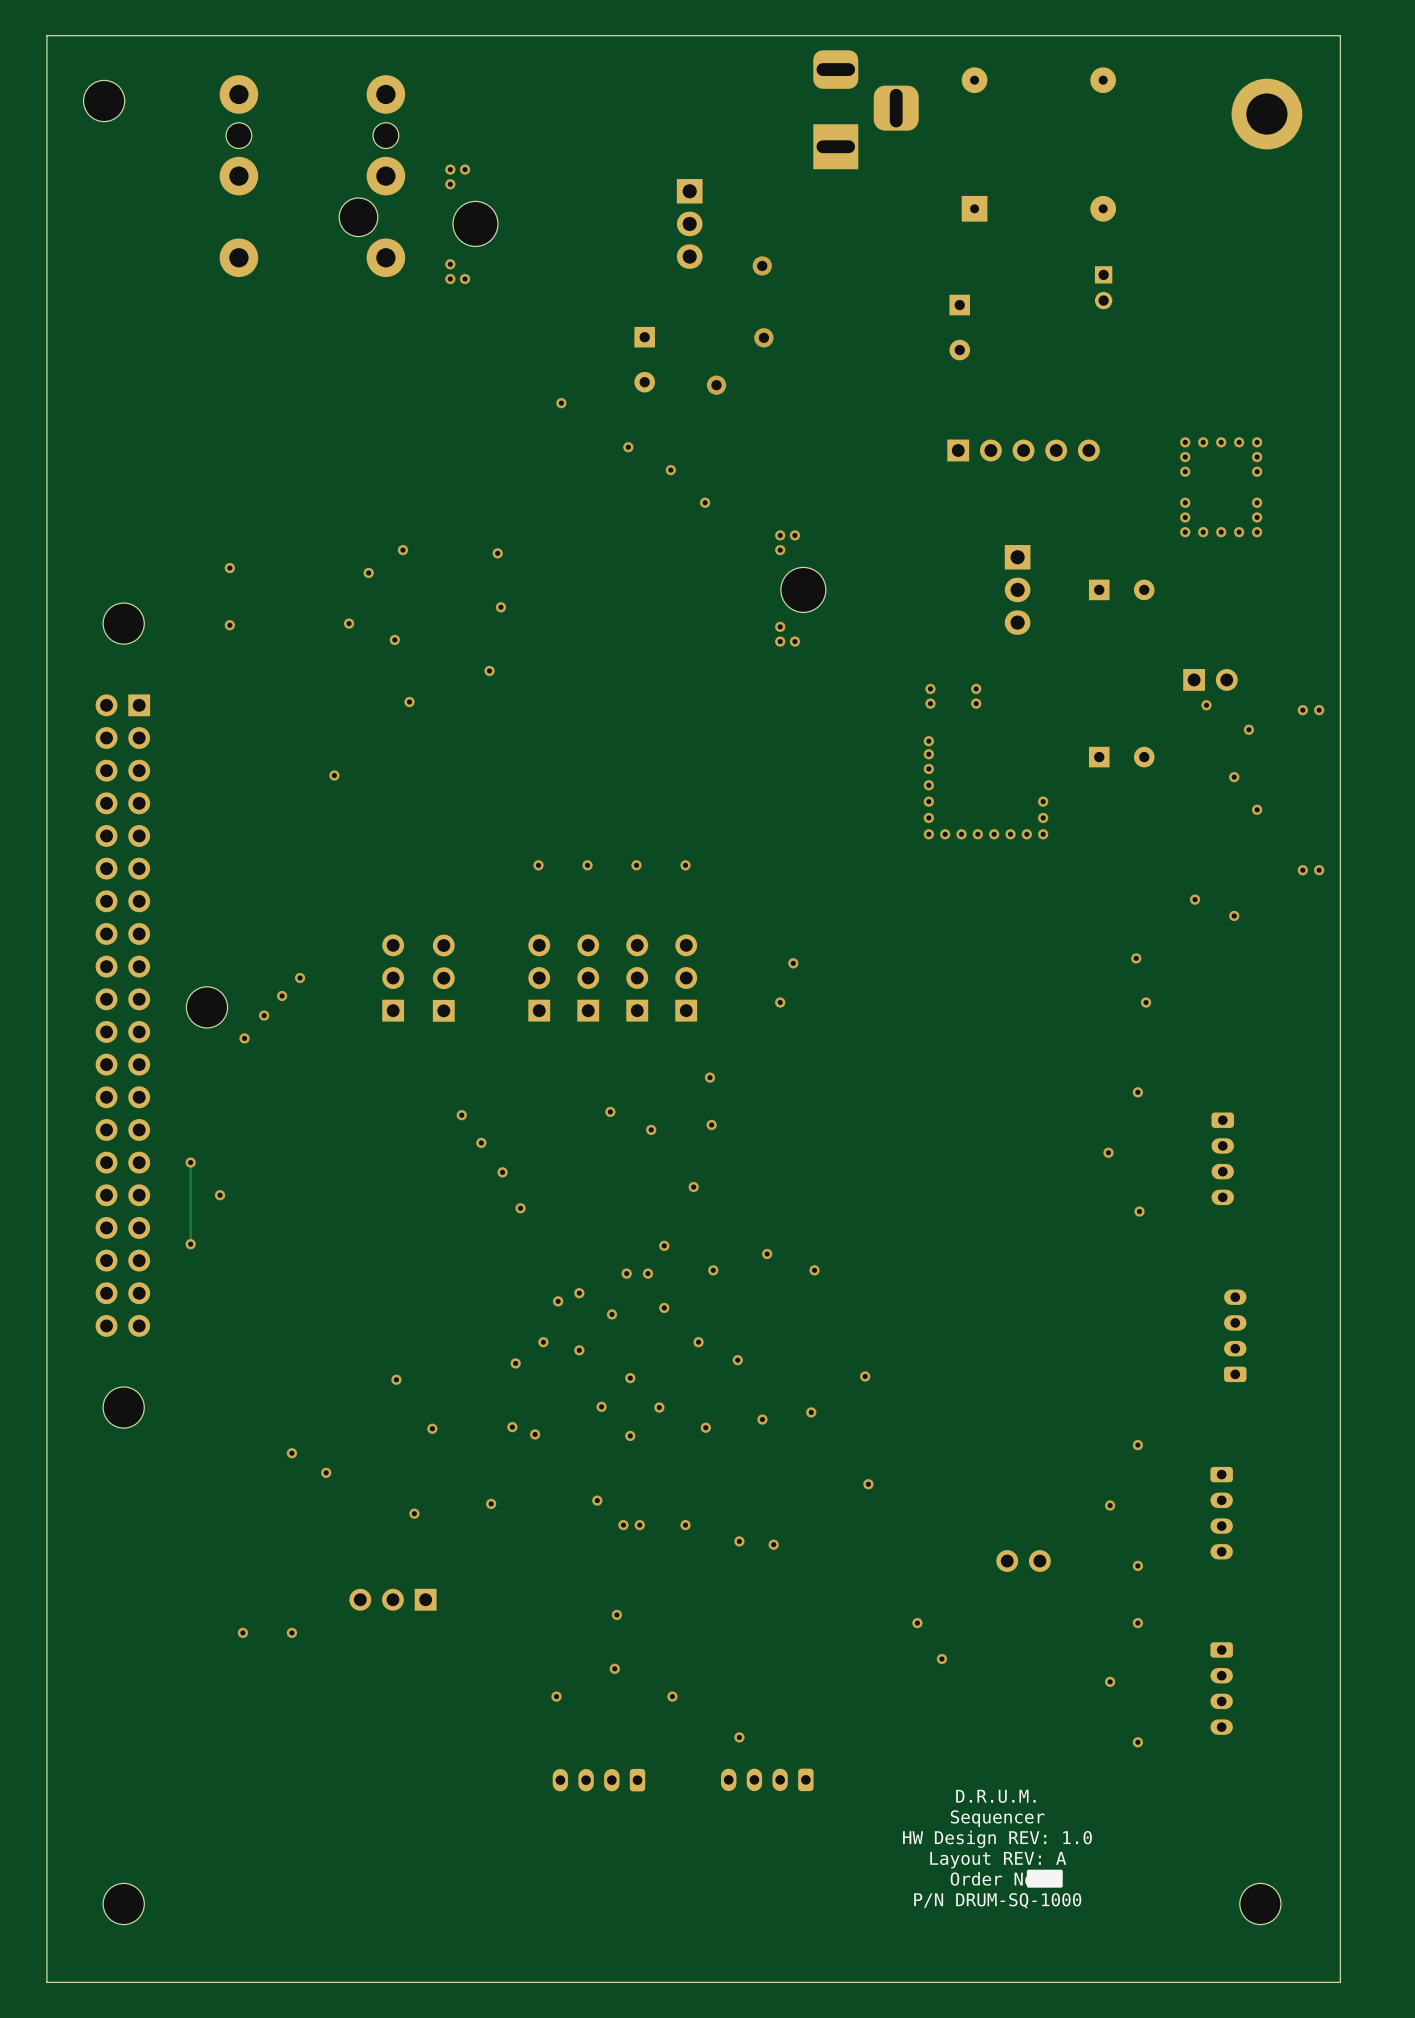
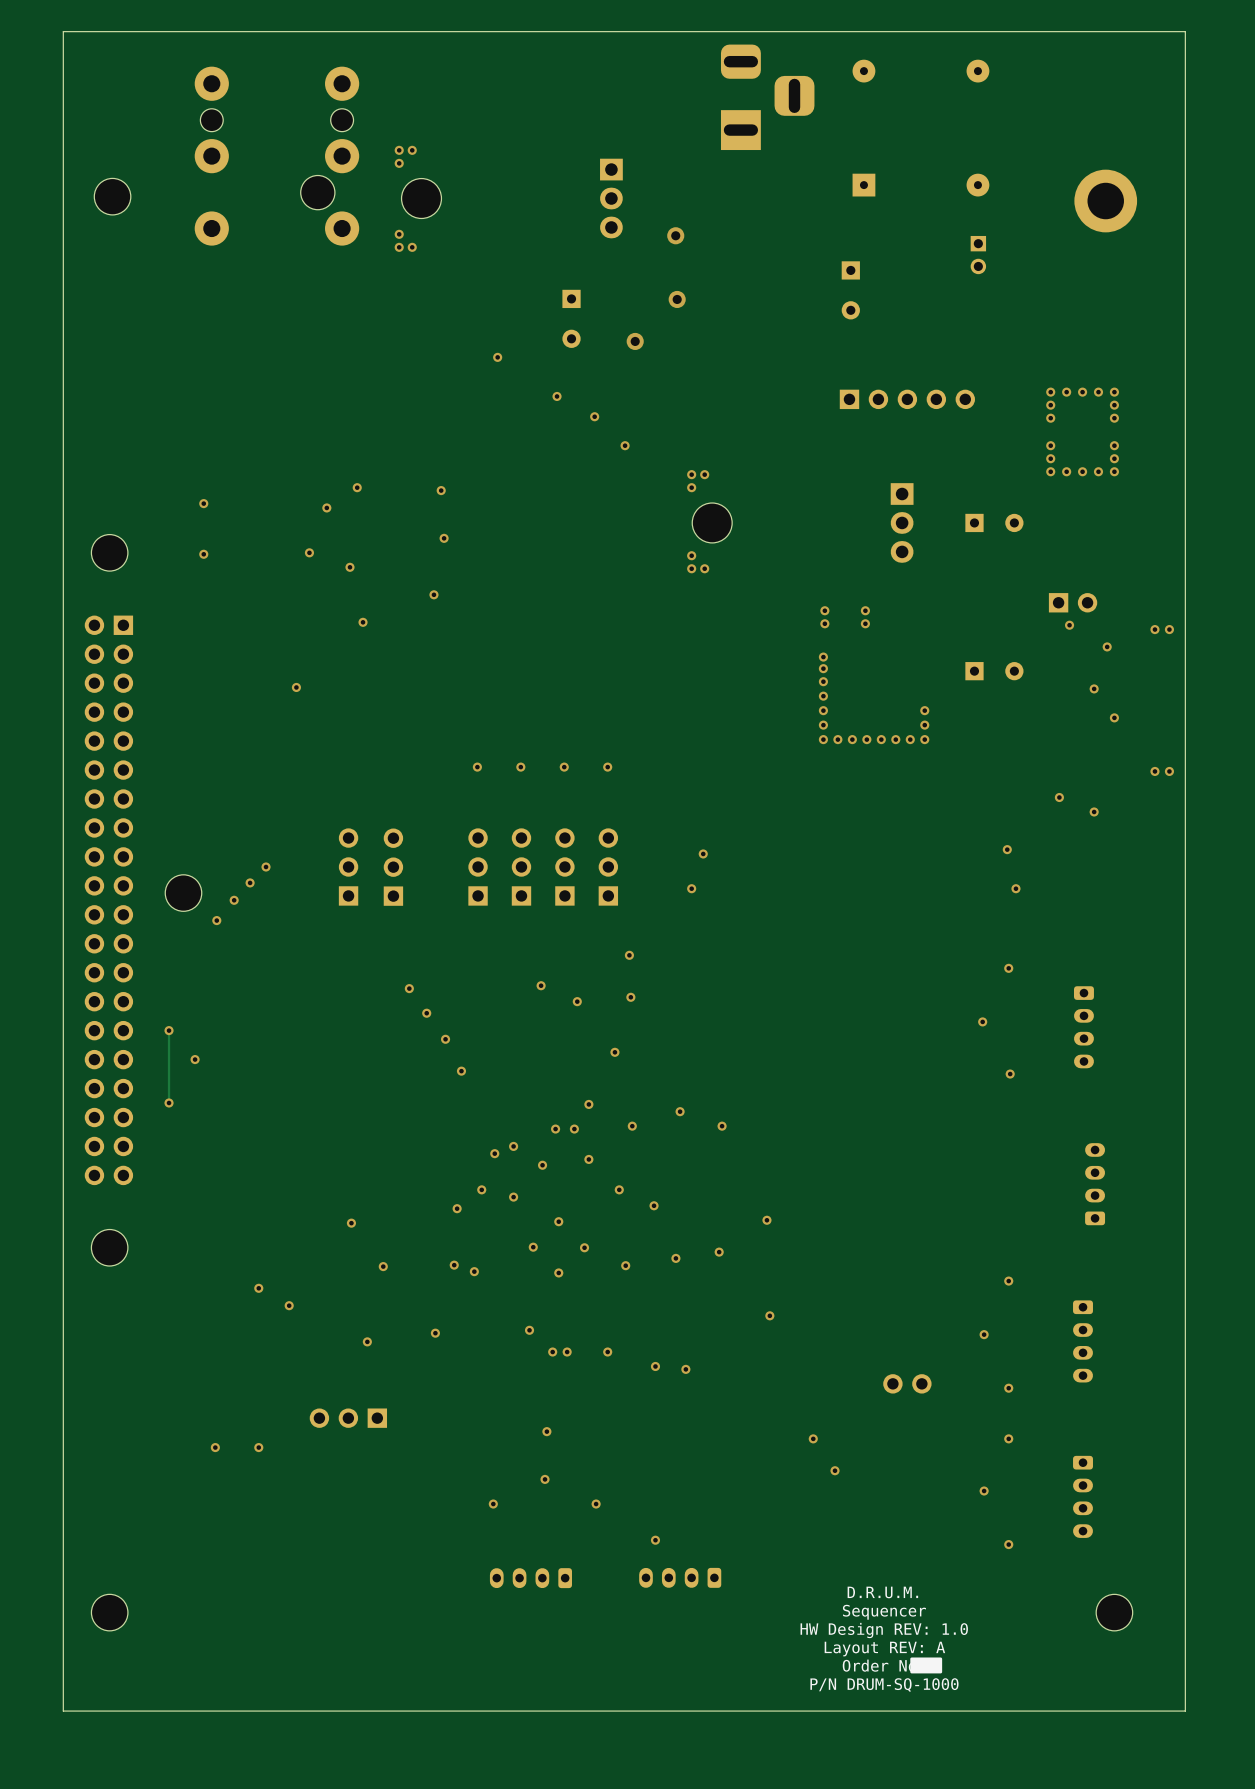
board edge: (1337, 35) (1340, 35) (1340, 1982) (46, 1982) (46, 35) (71, 35) -> (1185, 31) (1185, 1711) (63, 1711) (63, 31)
part position: (104, 101) -> (112, 196)
part position: (1266, 114) -> (1105, 201)
part position: (123, 1903) -> (109, 1612)
part position: (1260, 1903) -> (1114, 1612)

